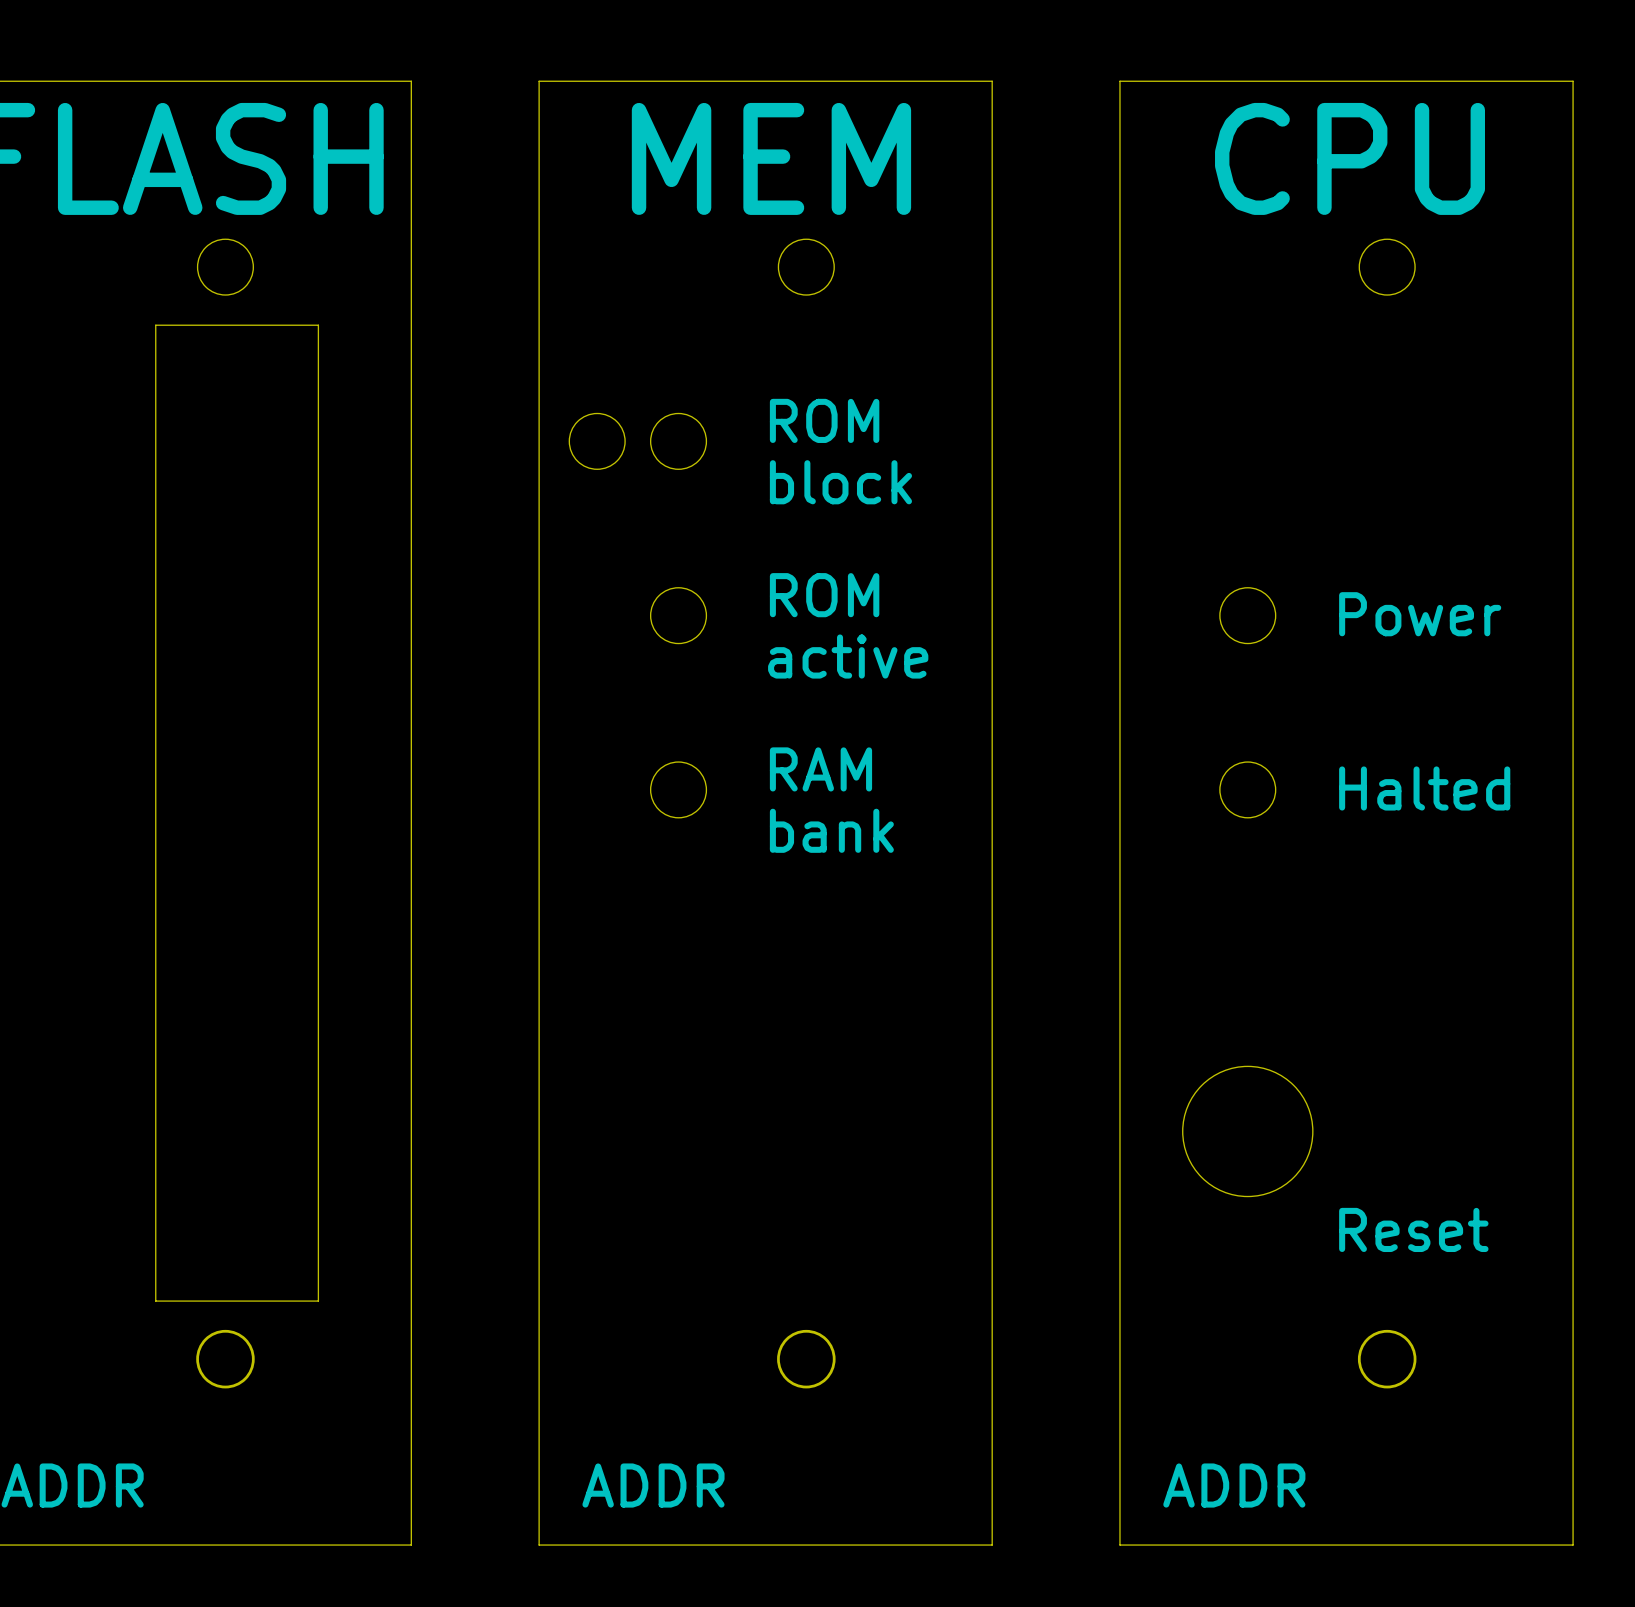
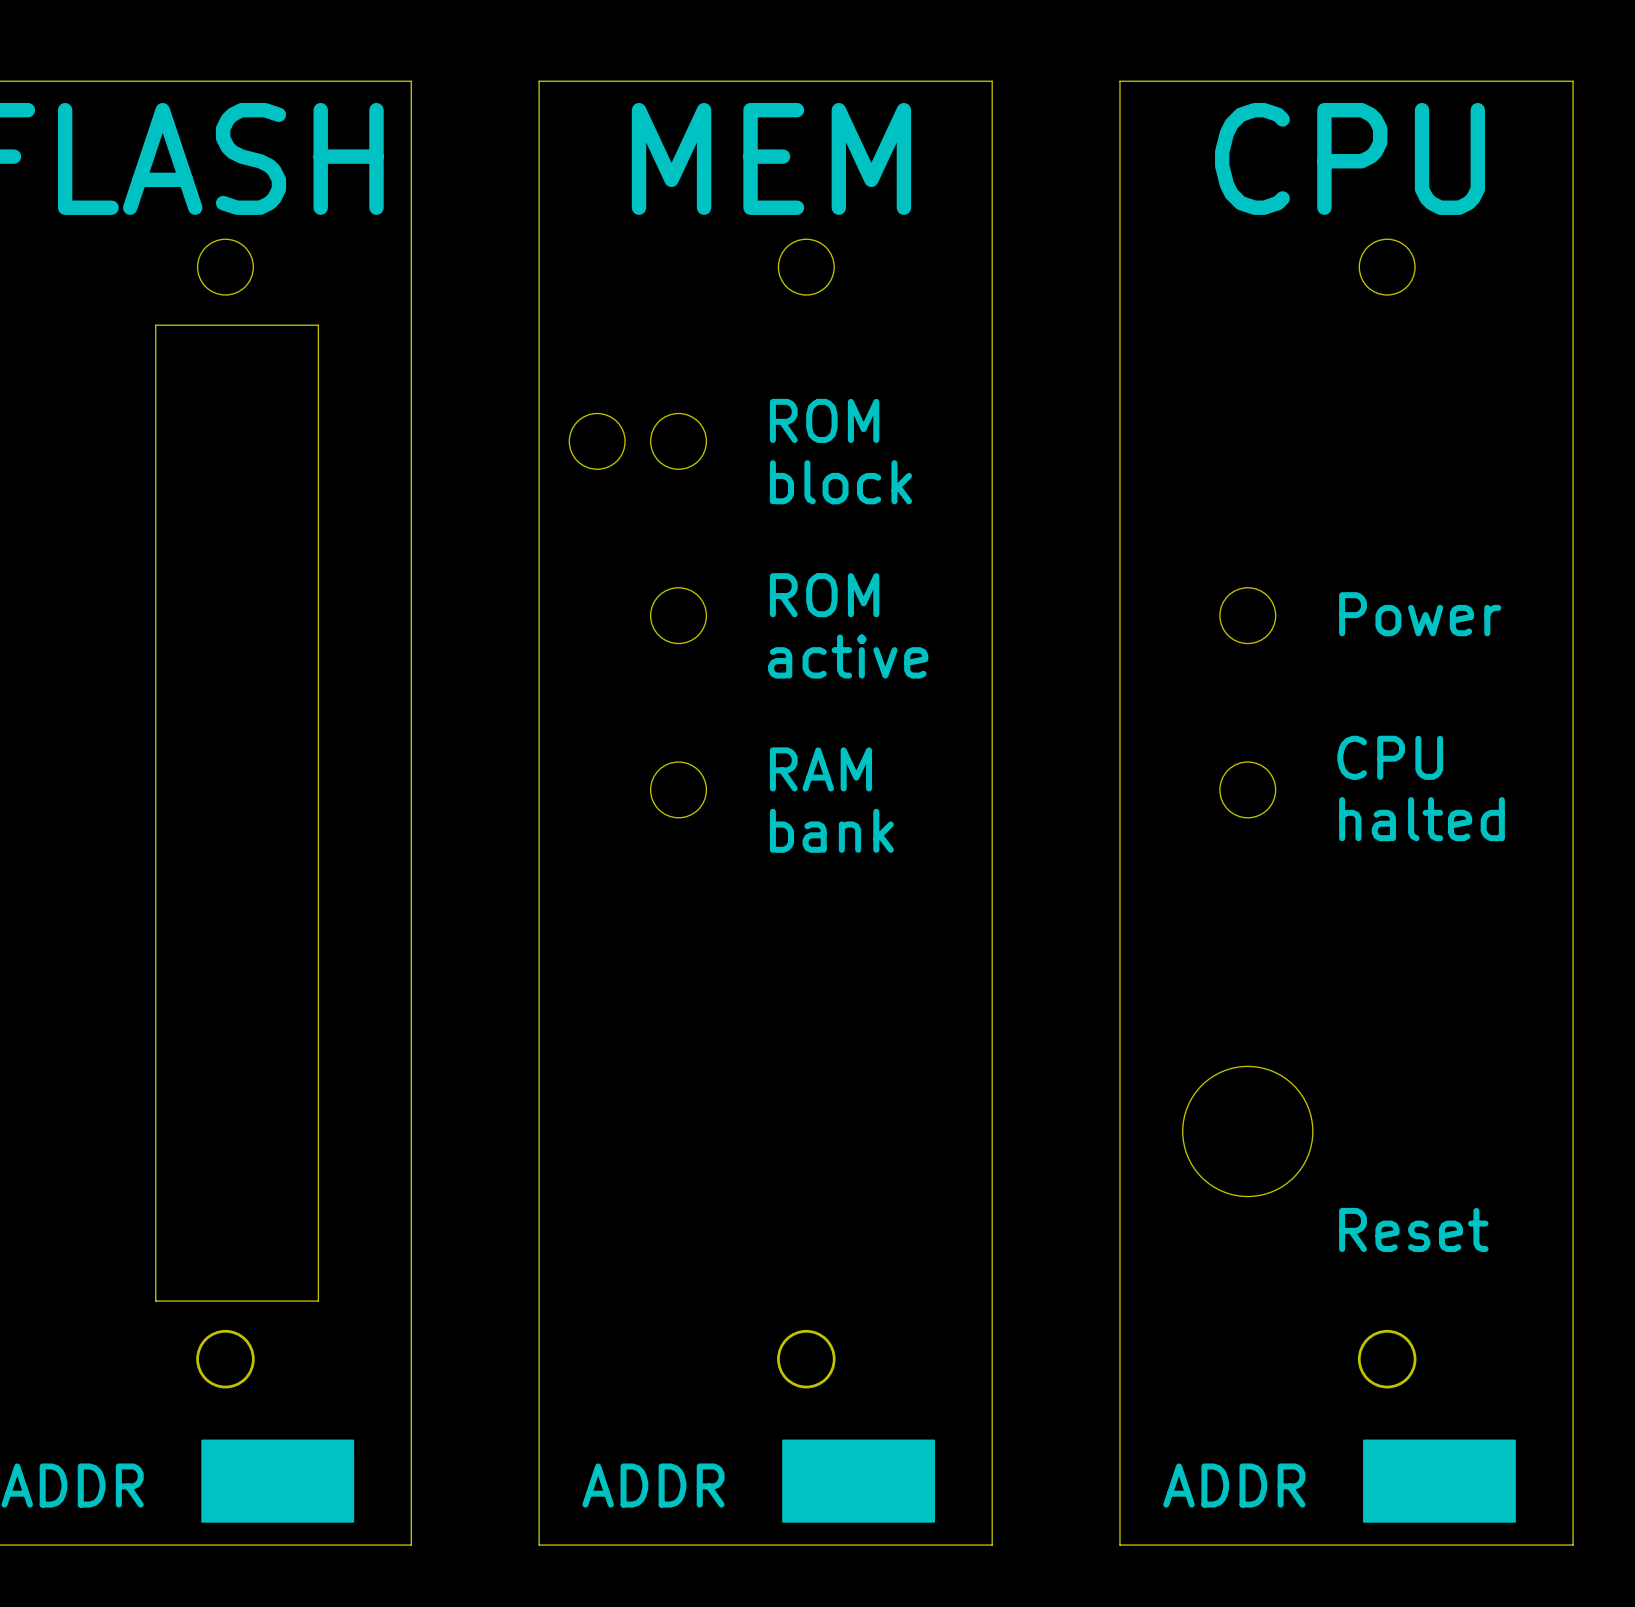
text: none -> CPU (1390, 757)
text: Halted (1424, 788) -> halted (1421, 819)
drawing: none -> [201, 1439, 355, 1523]
drawing: none -> [782, 1439, 936, 1523]
drawing: none -> [1363, 1439, 1516, 1523]

